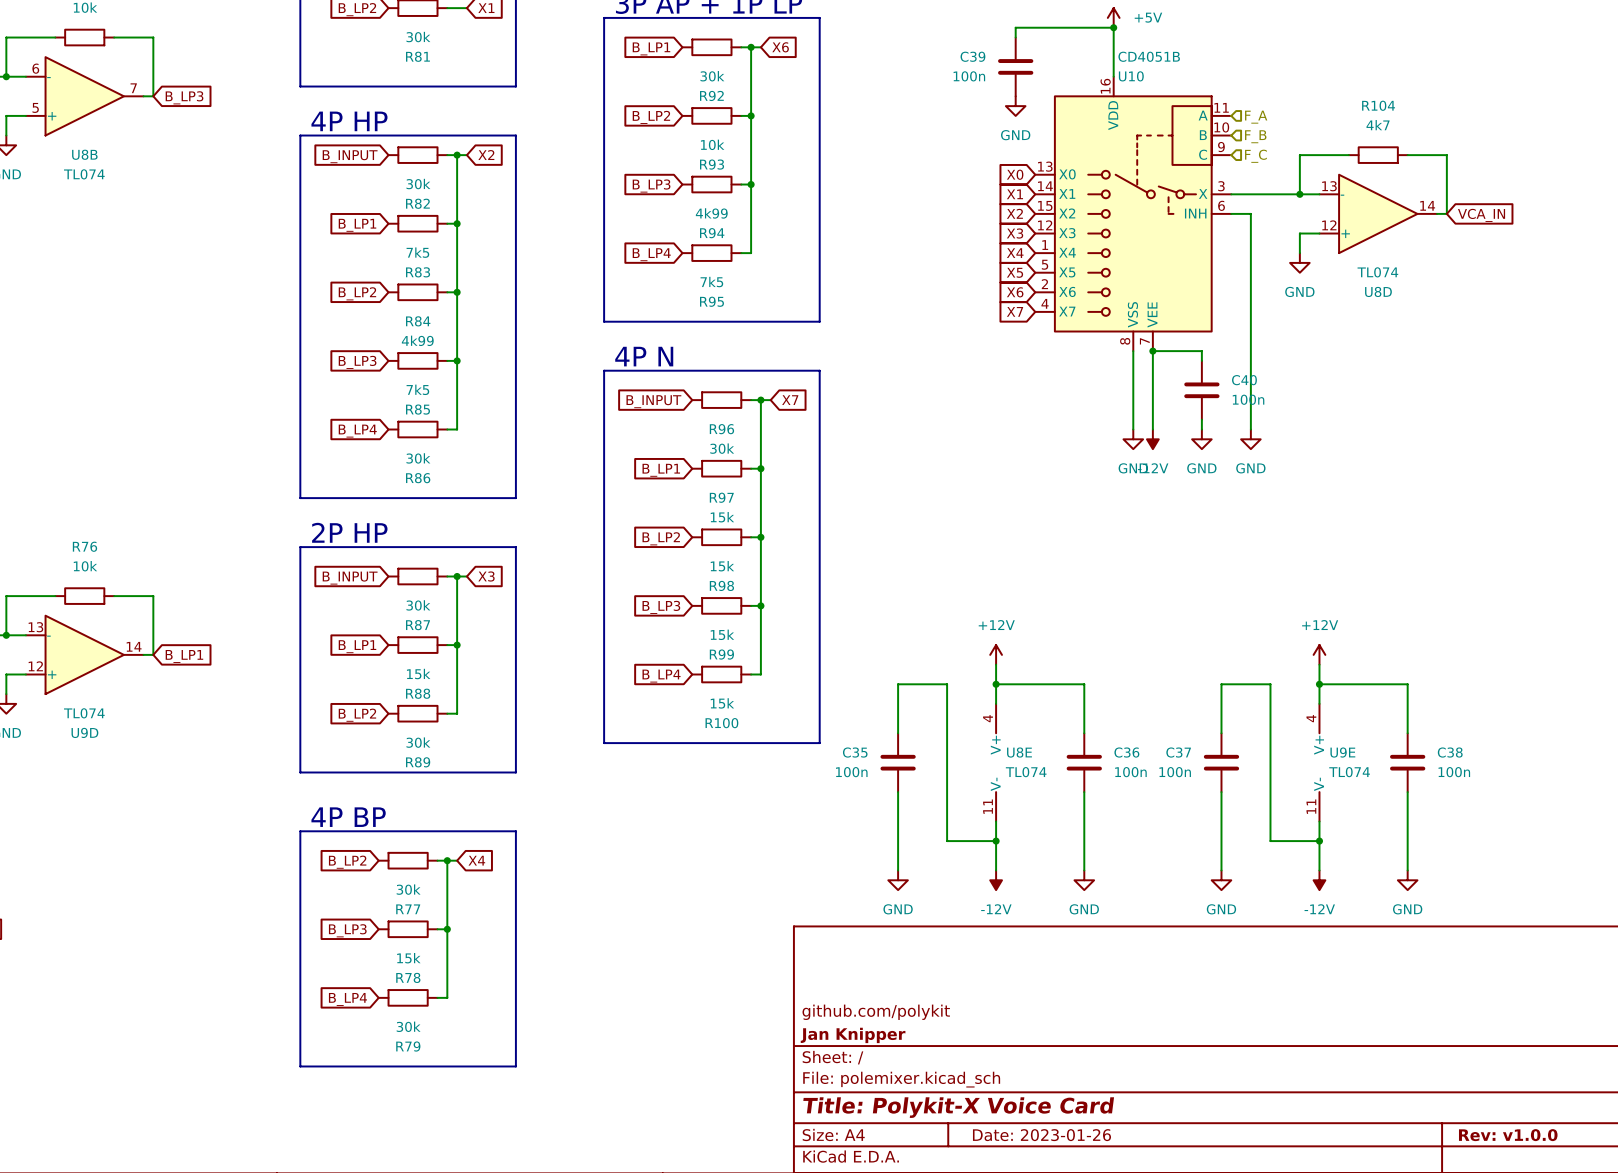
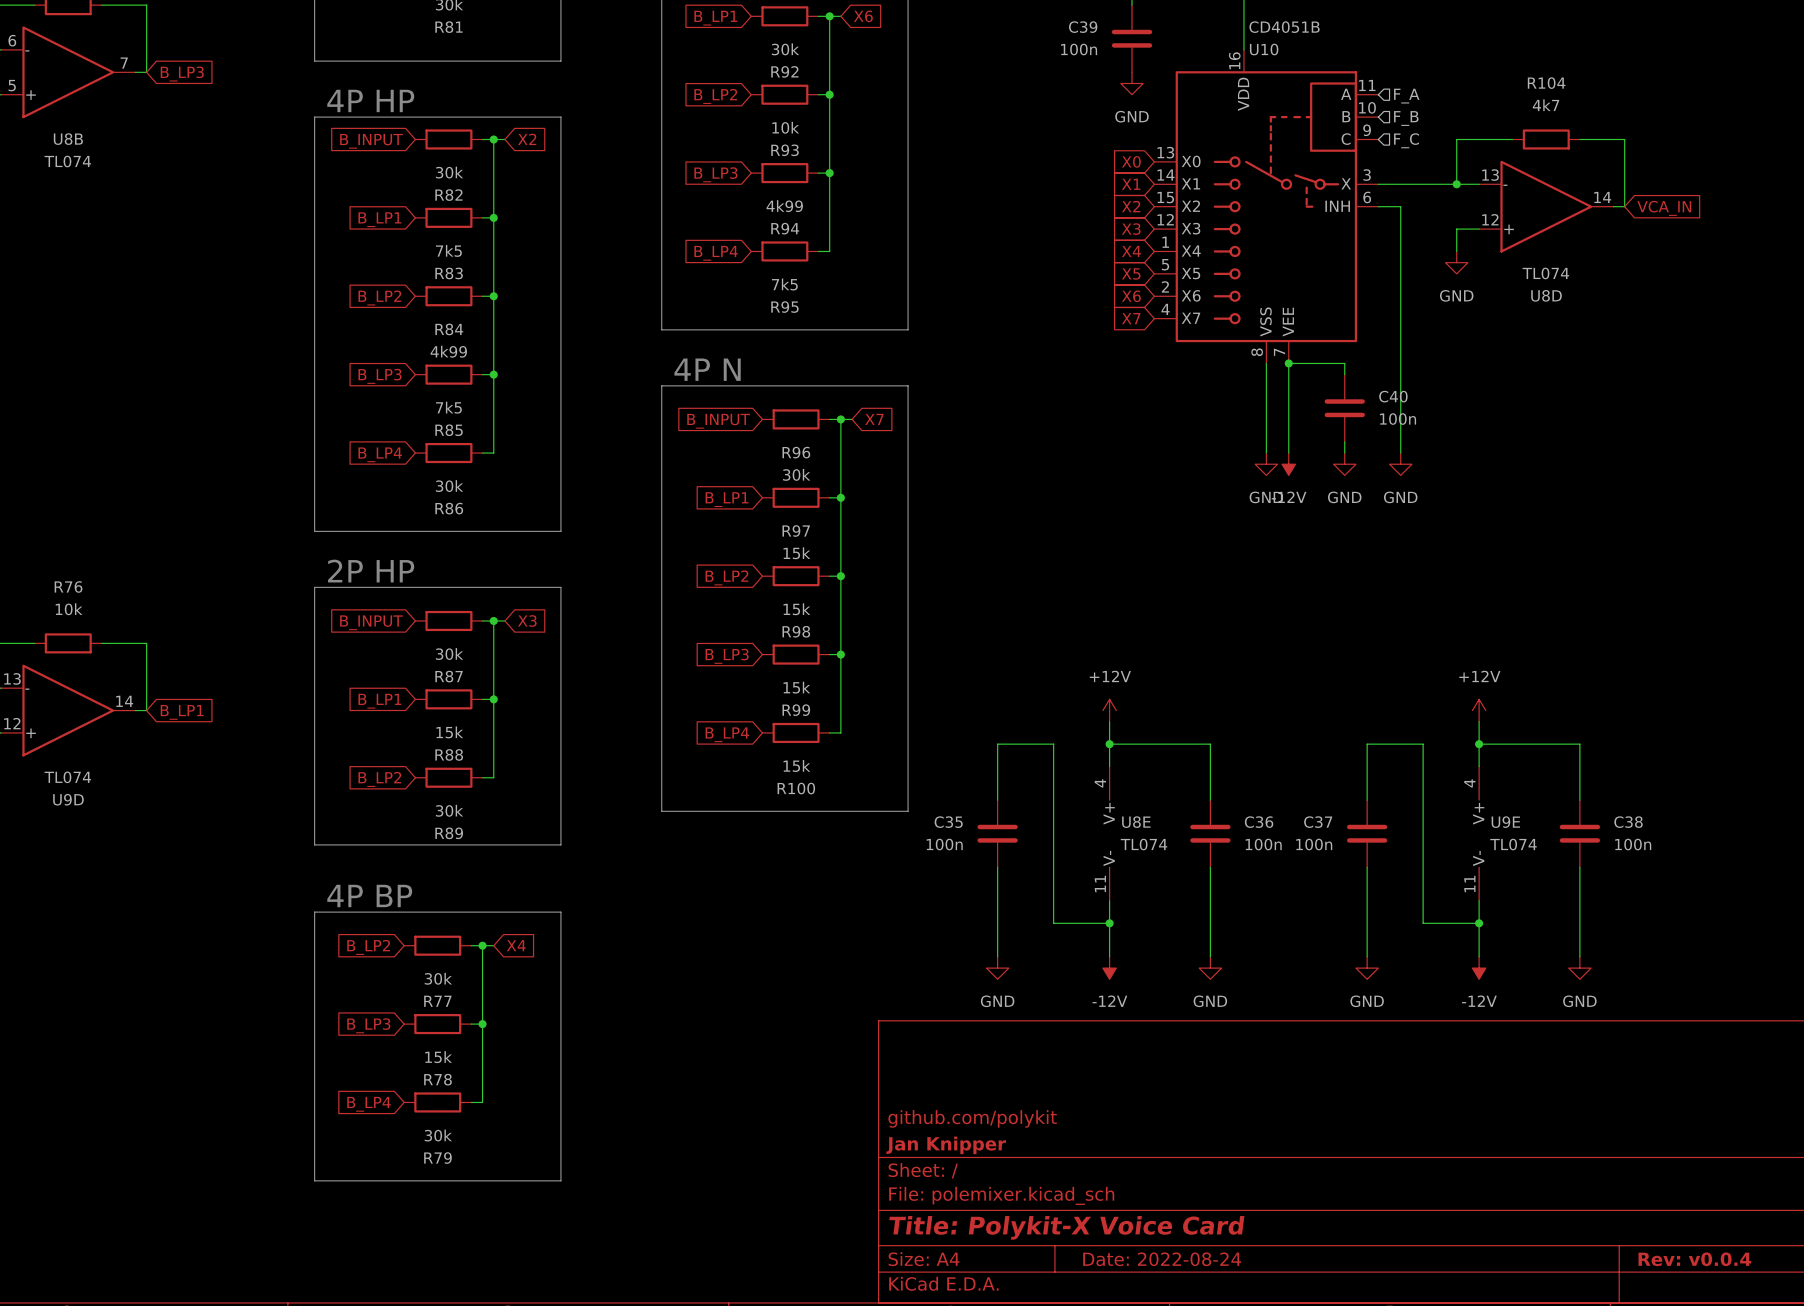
title block: Date: 2023-01-26 (1041, 1135) -> Date: 2022-08-24 (1162, 1259)
title block: Rev: v1.0.0 (1508, 1135) -> Rev: v0.0.4 (1694, 1259)

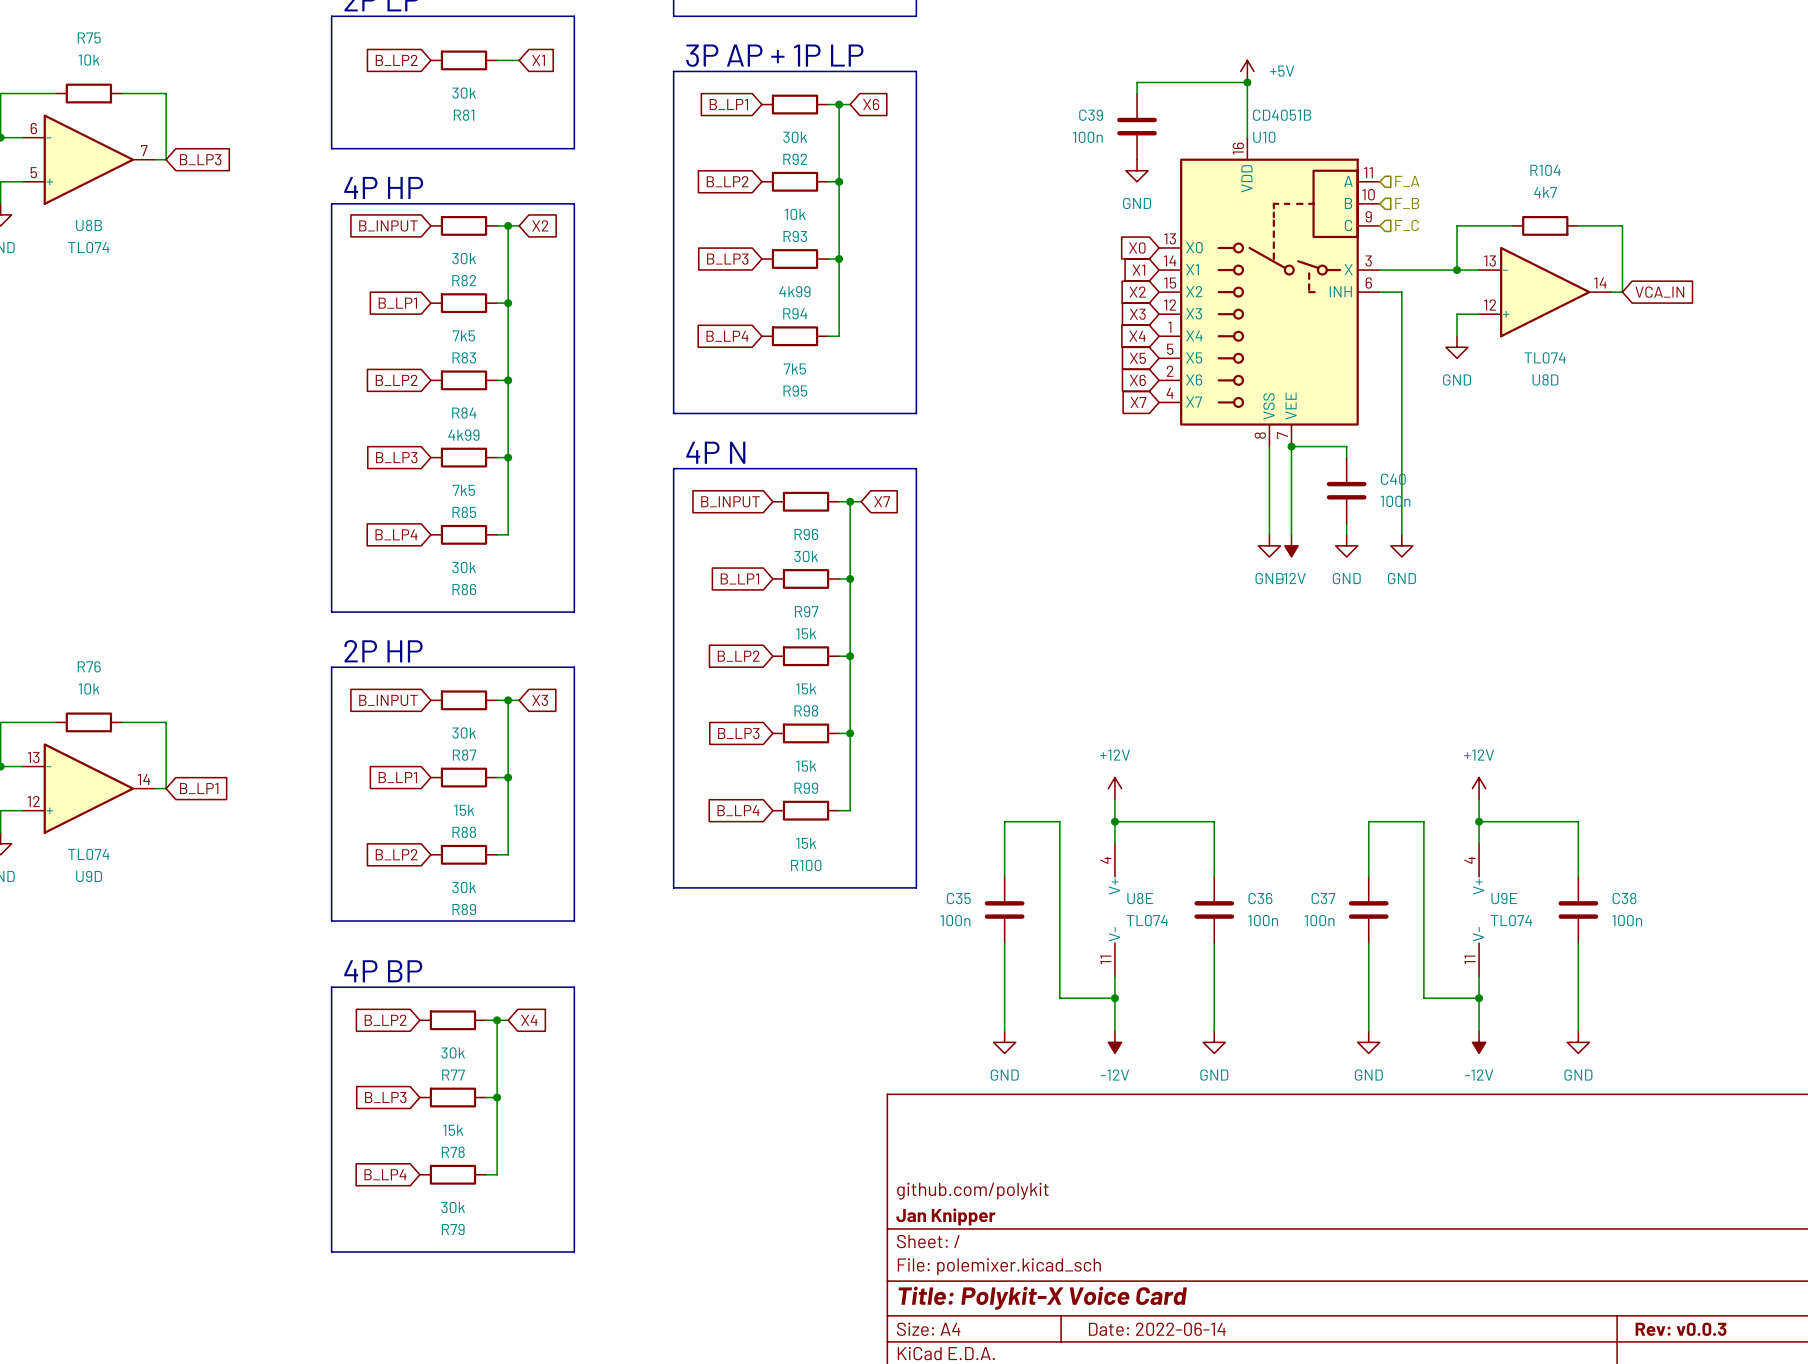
title block: Date: 2022-08-24 (1162, 1259) -> Date: 2022-06-14 (1157, 1329)
title block: Rev: v0.0.4 (1694, 1259) -> Rev: v0.0.3 (1681, 1329)

